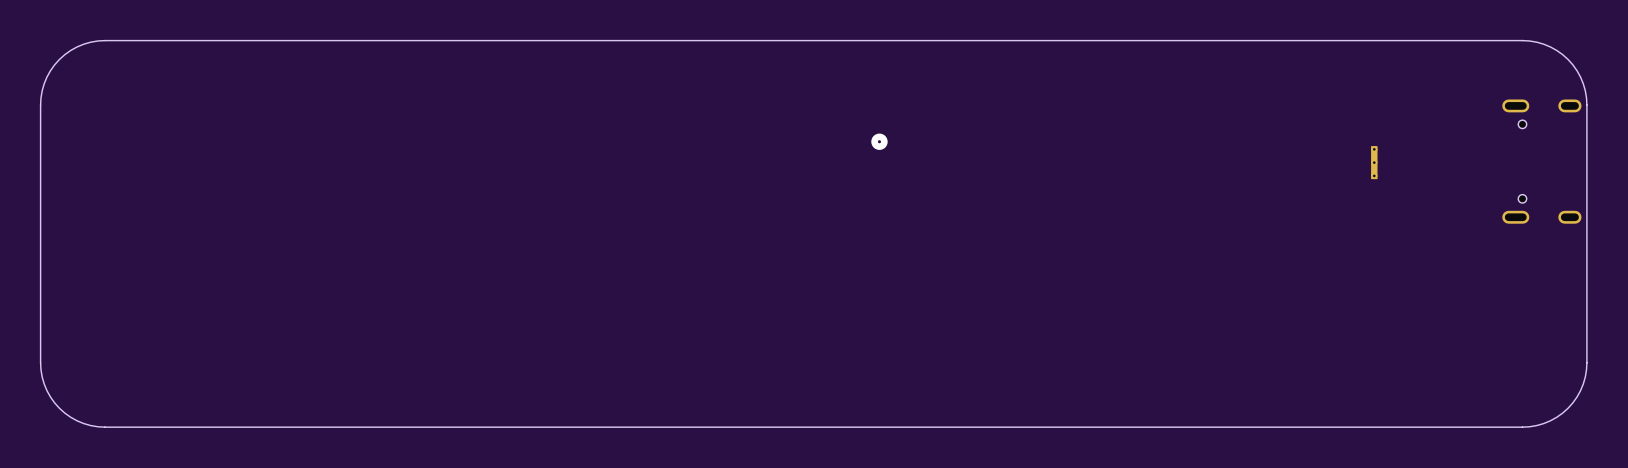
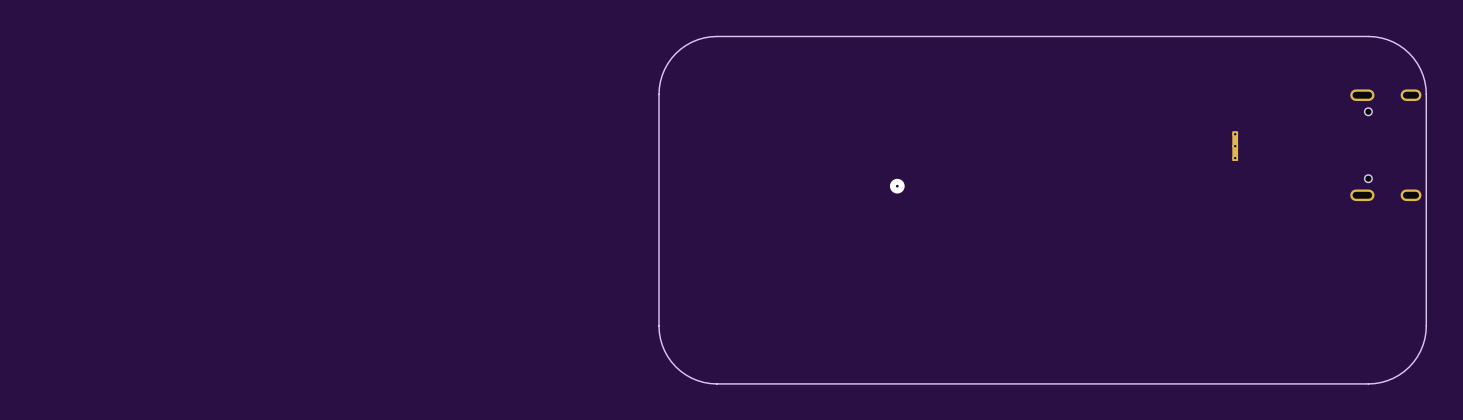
board edge: (797, 40) (97, 41) (77, 46) (59, 59) (46, 77) (42, 90) (40, 105) (41, 369) (46, 390) (54, 402) (64, 413) (77, 420) (90, 425) (105, 427) (797, 427) -> (716, 36) (691, 42) (675, 53) (664, 69) (659, 94) (660, 338) (667, 356) (680, 371) (697, 380) (716, 383)
part position: (879, 141) -> (897, 186)

